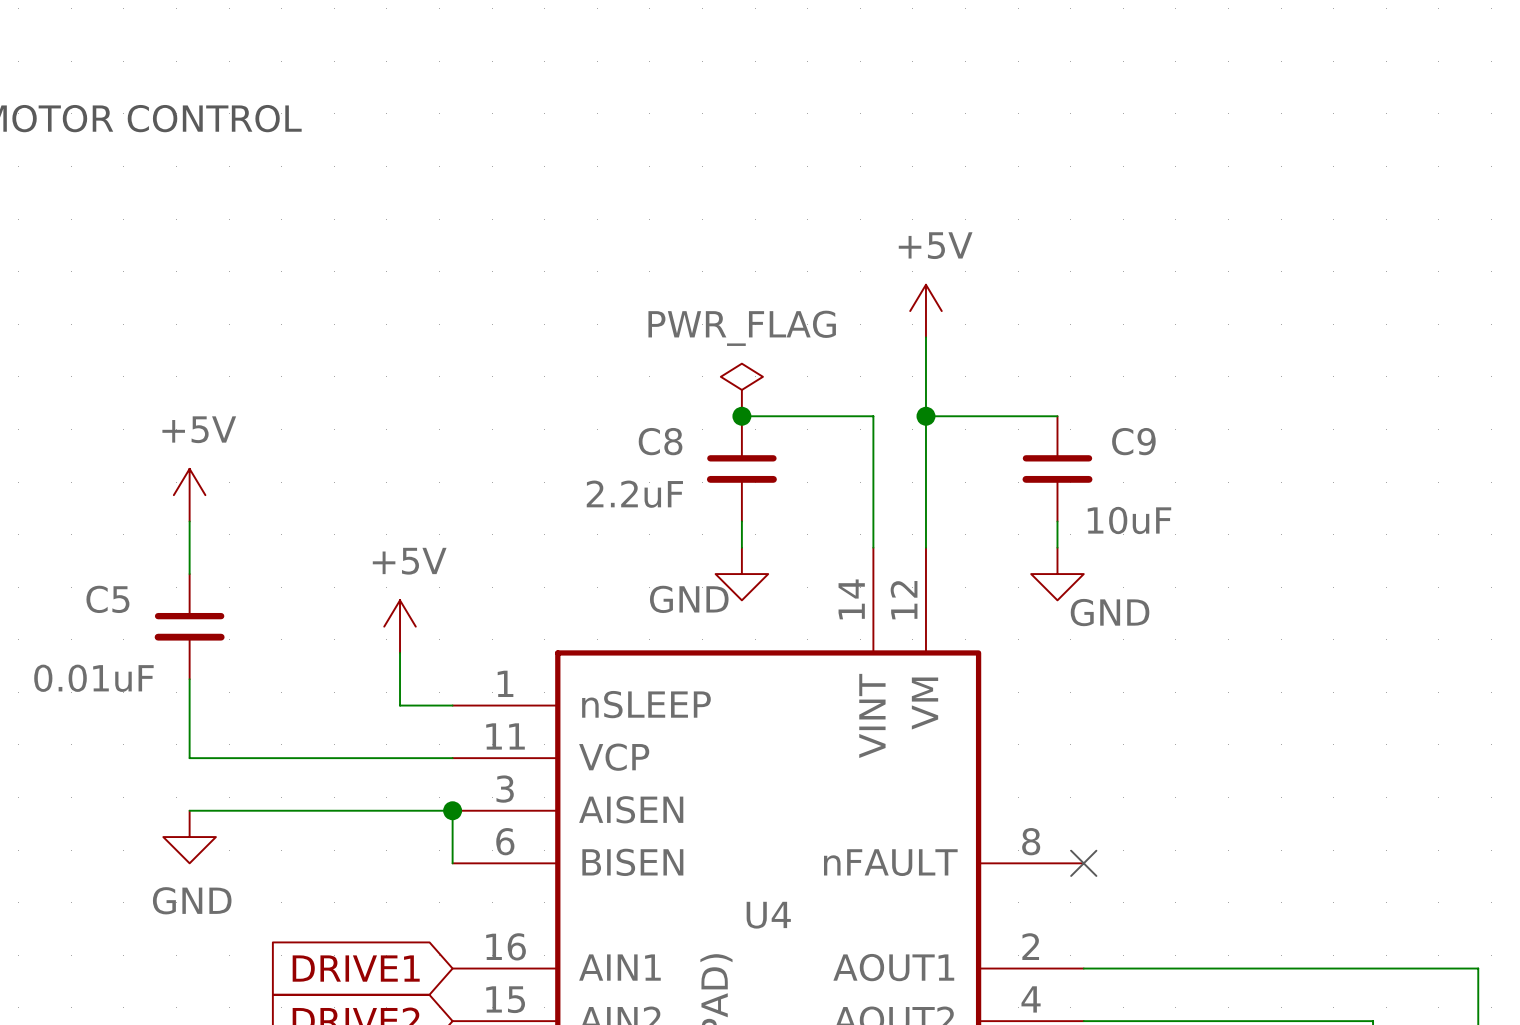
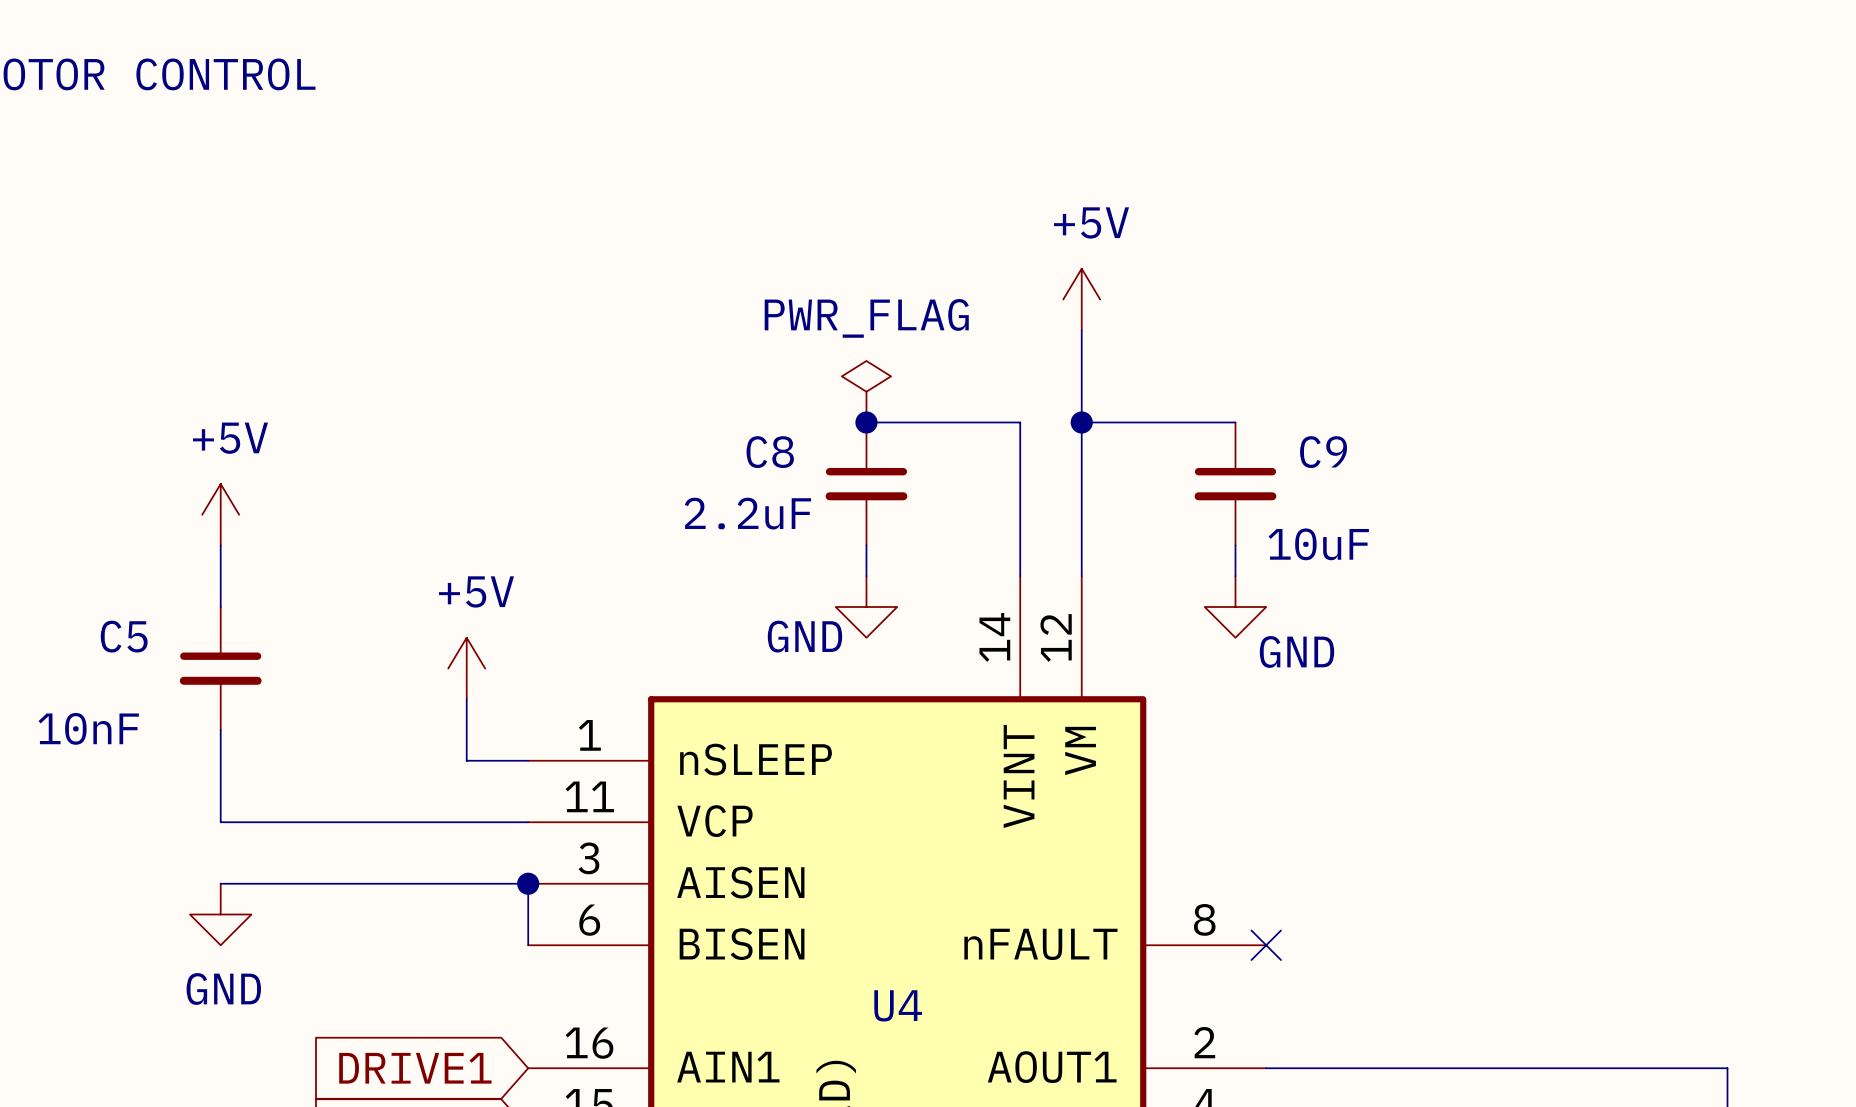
C5 value: 0.01uF (93, 678) -> 10nF (88, 728)

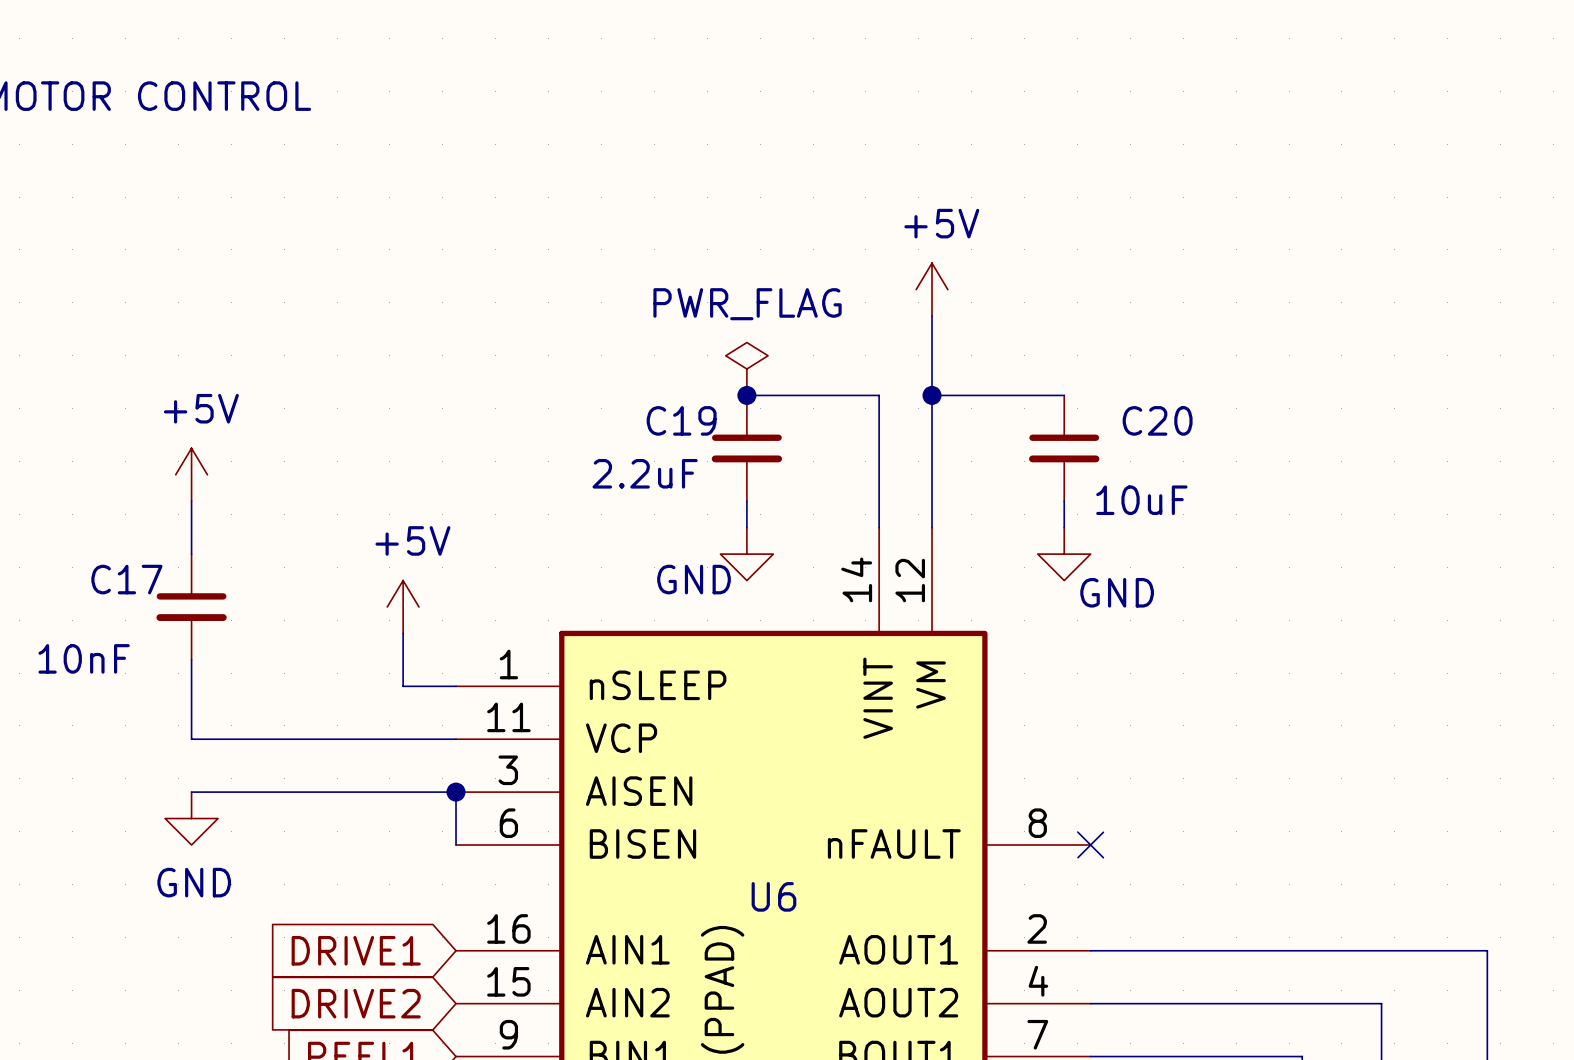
C8 name: C8 (770, 452) -> C19 (681, 420)
C9 name: C9 (1323, 452) -> C20 (1157, 420)
C5 name: C5 (124, 636) -> C17 (126, 579)
U4 name: U4 (898, 1005) -> U6 (773, 896)

